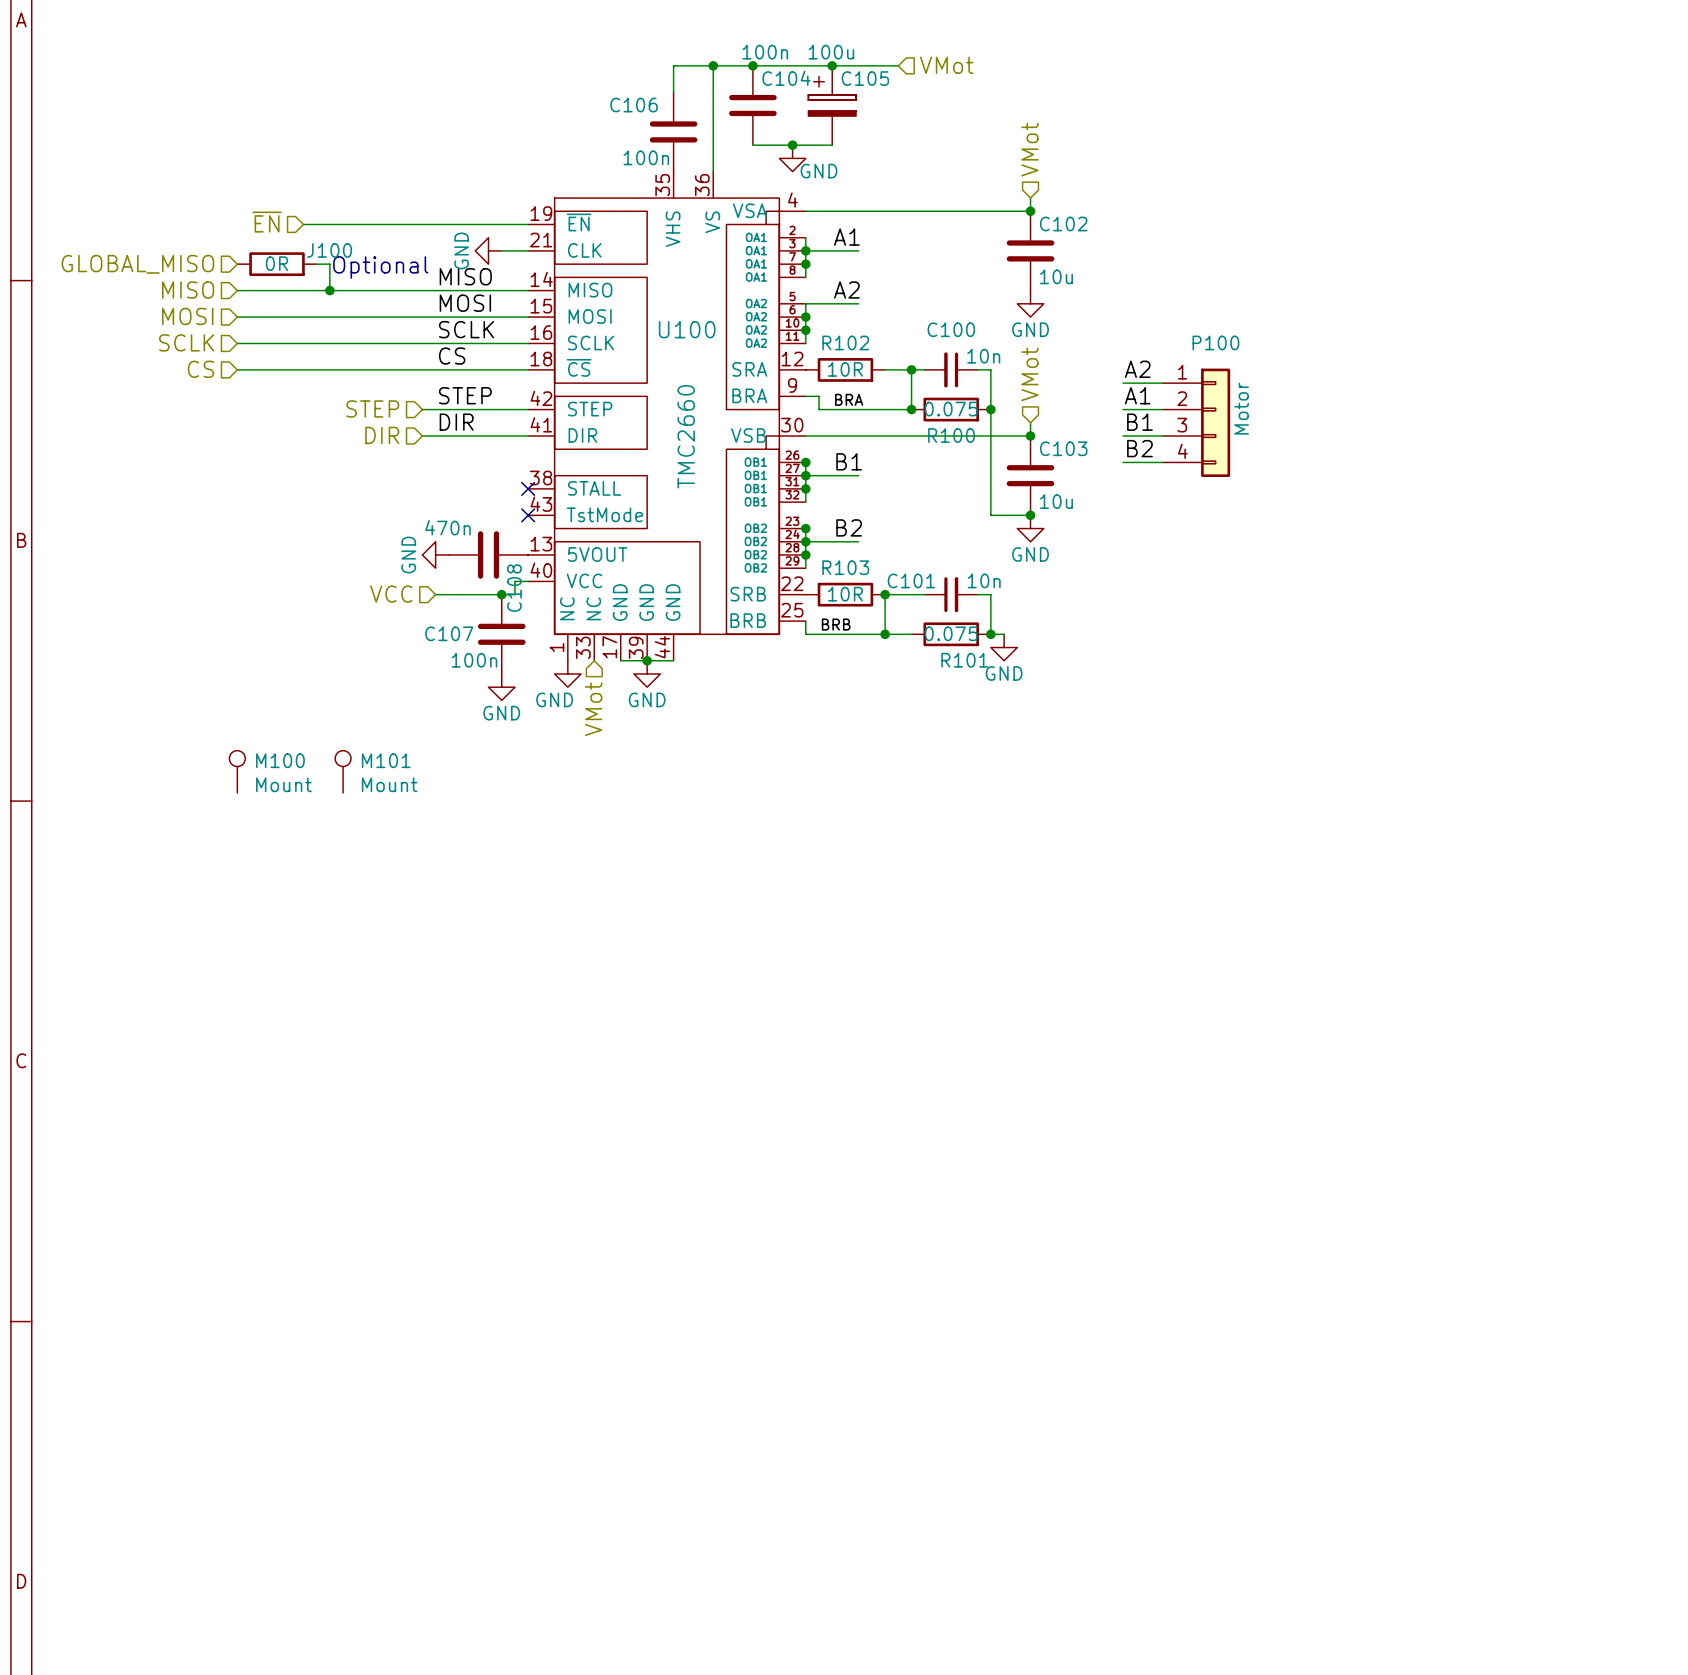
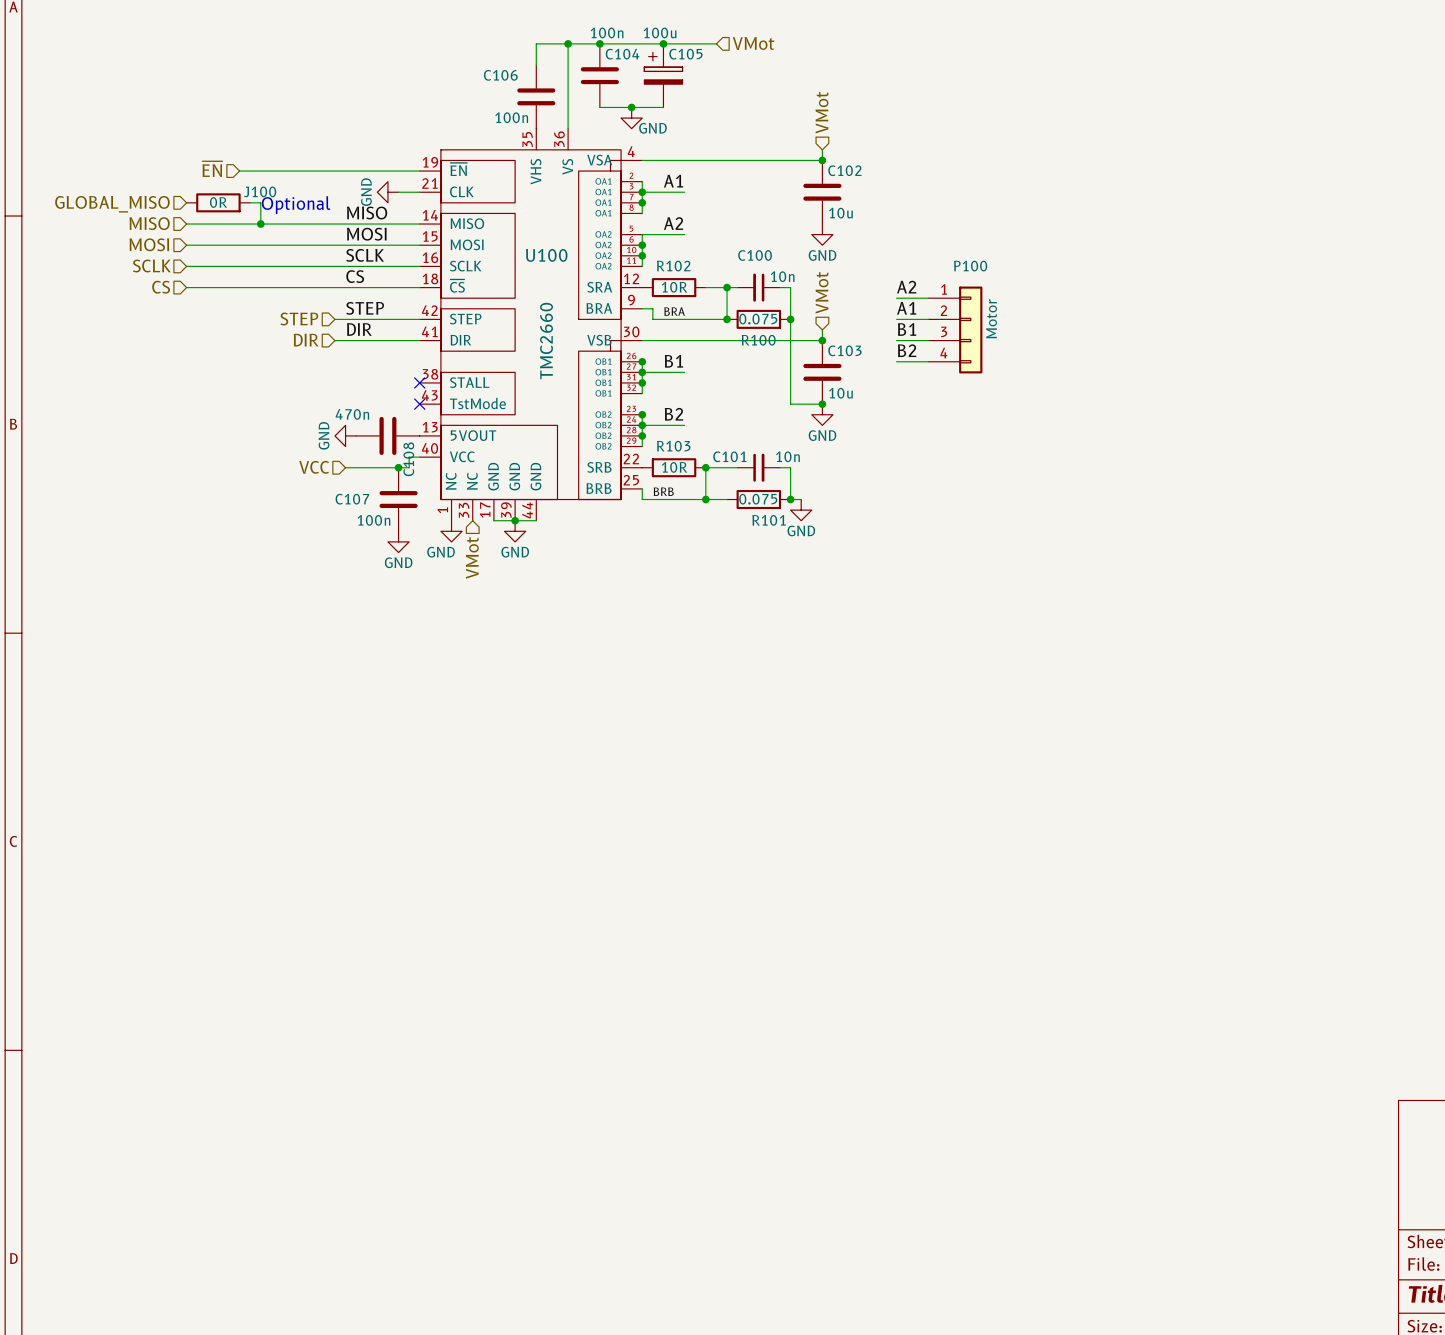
M100: Mount (237, 771) -> none
M101: Mount (343, 771) -> none

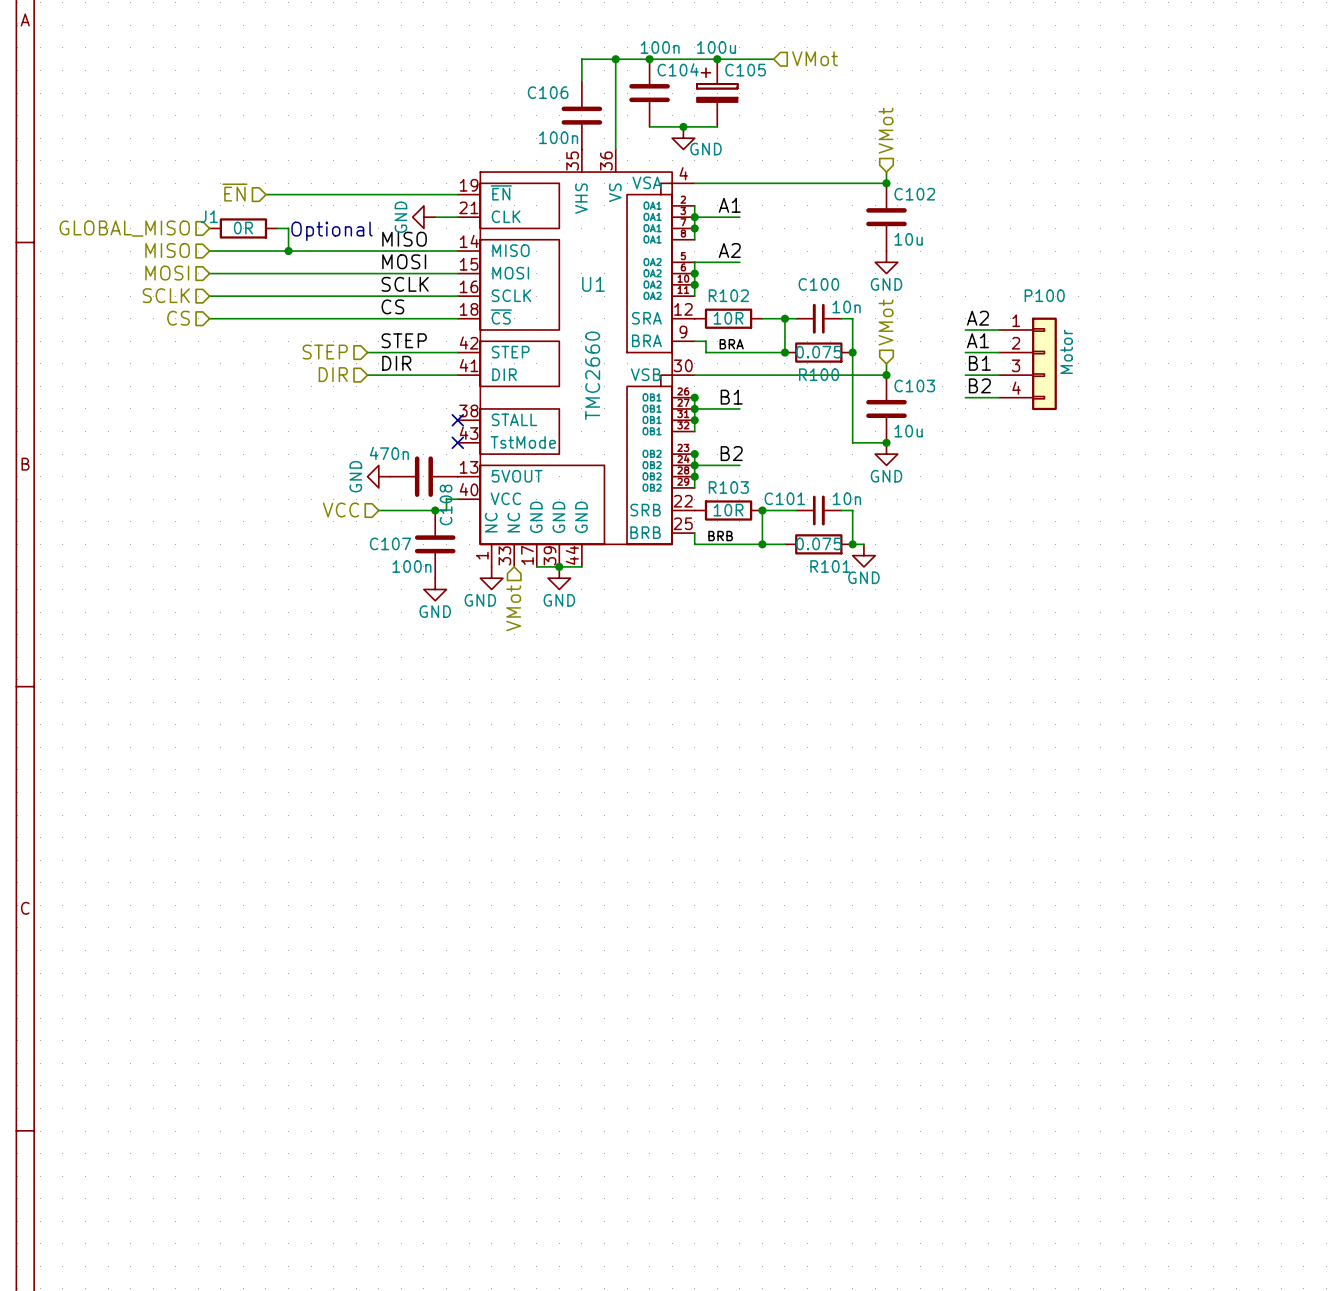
J100 name: J100 (260, 191) -> J1 (209, 216)
U100 name: U100 (546, 255) -> U1 (593, 284)

